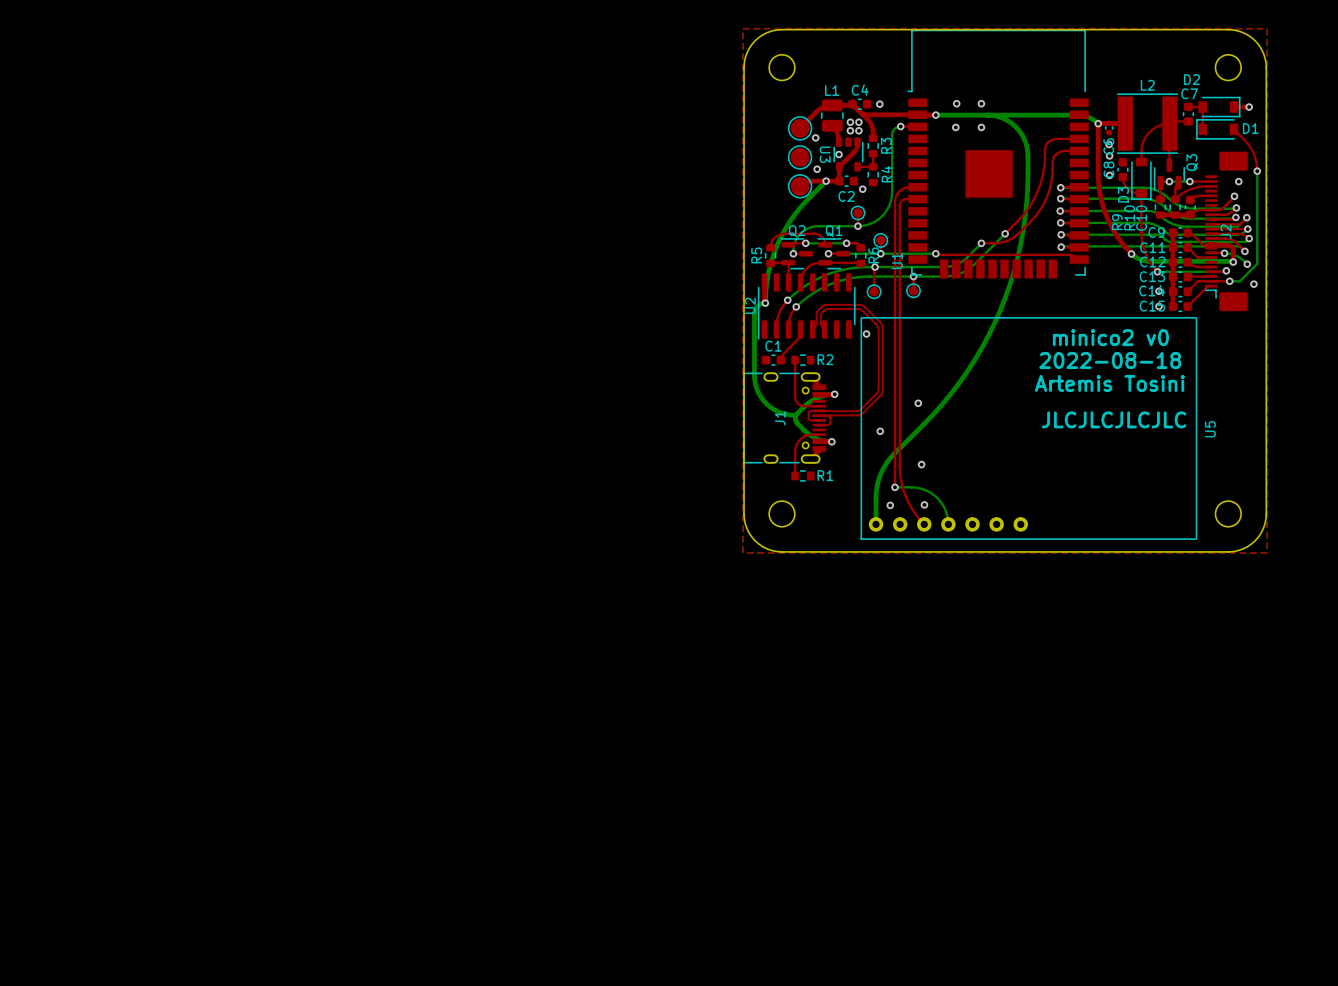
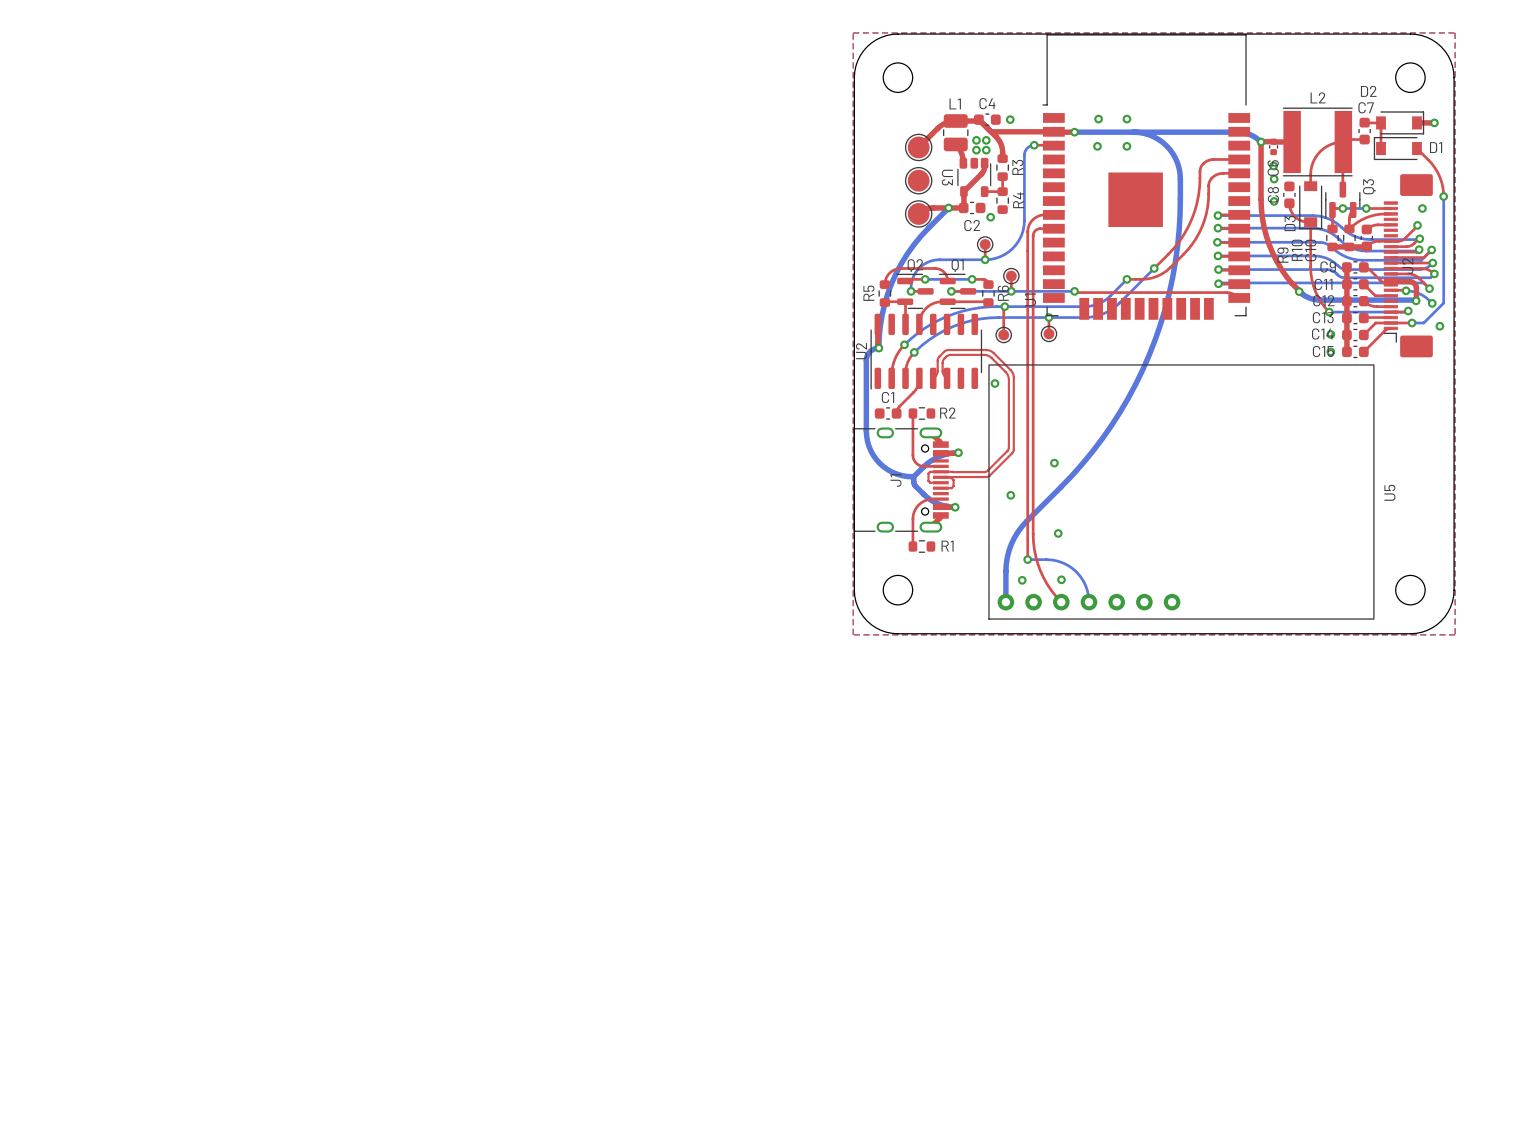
via: (815, 137) -> none
via: (838, 154) -> none
via: (817, 169) -> none
text: minico2 v0 (1110, 337) -> none
text: 2022-08-18 (1110, 360) -> none
text: Artemis Tosini (1109, 383) -> none
text: JLCJLCJLCJLC (1114, 419) -> none

